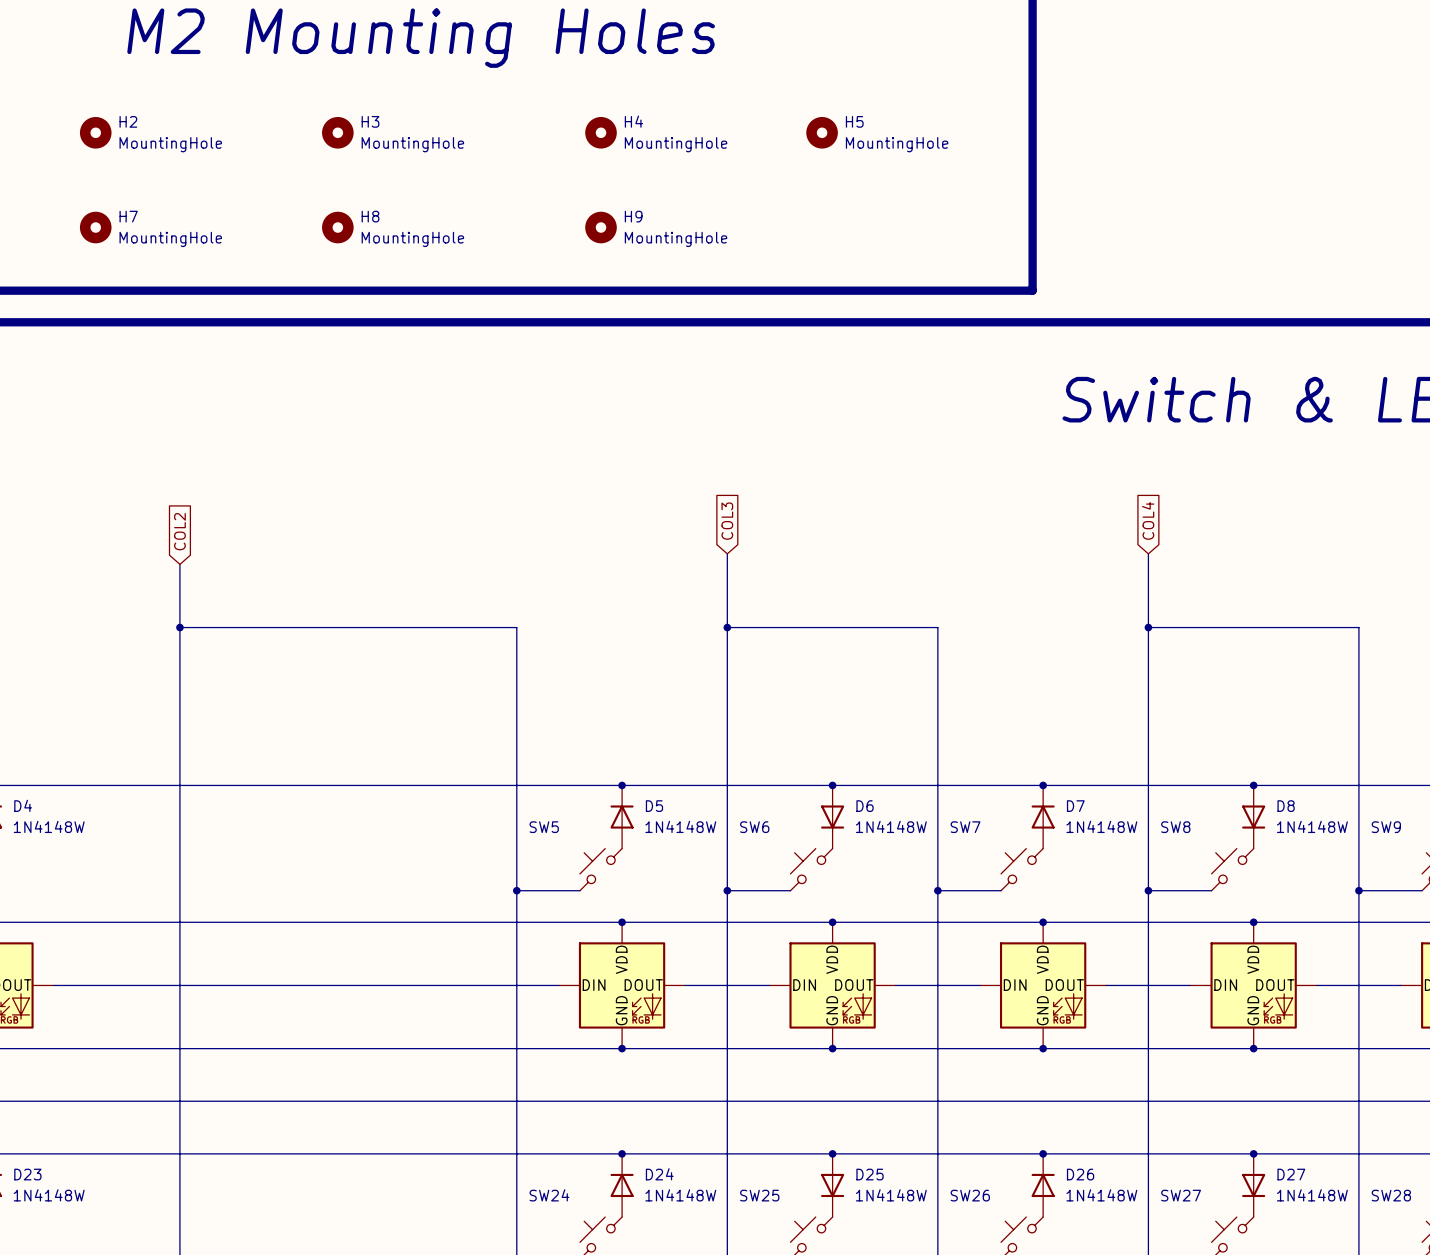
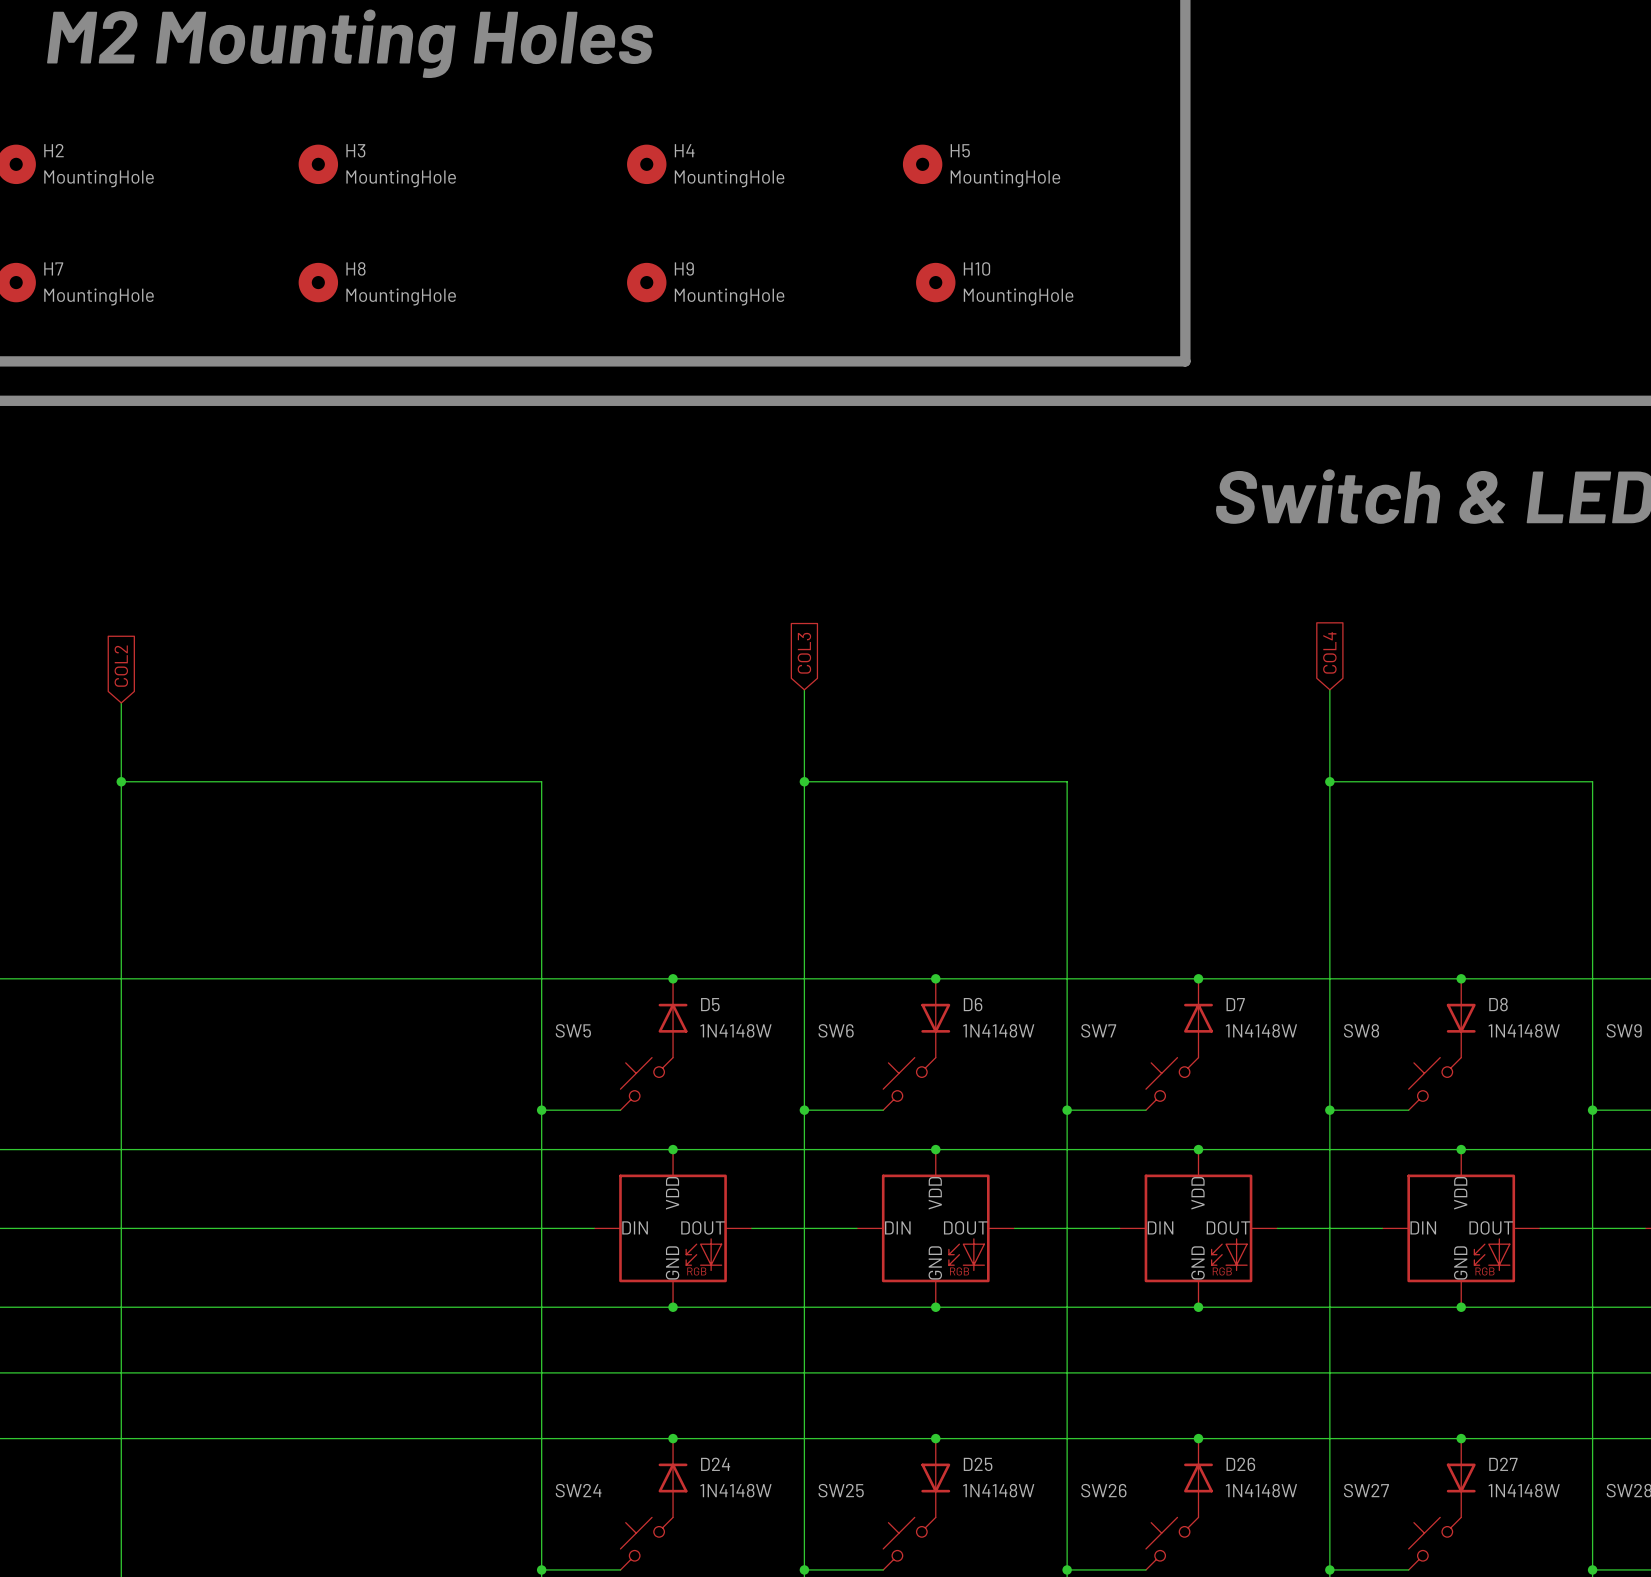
H10: none -> MountingHole (935, 282)

